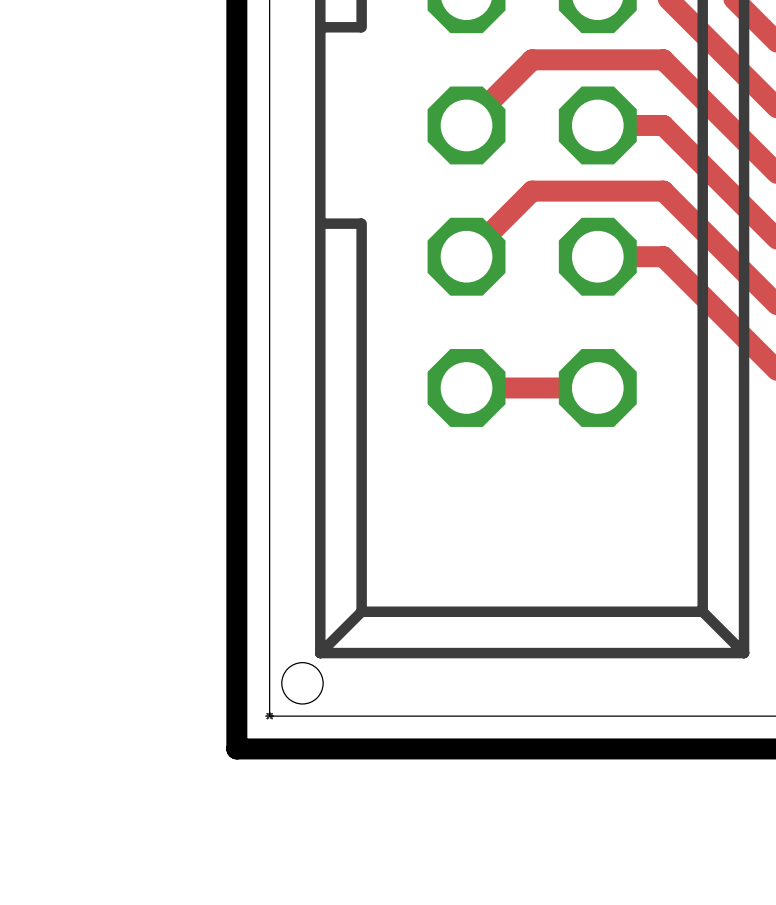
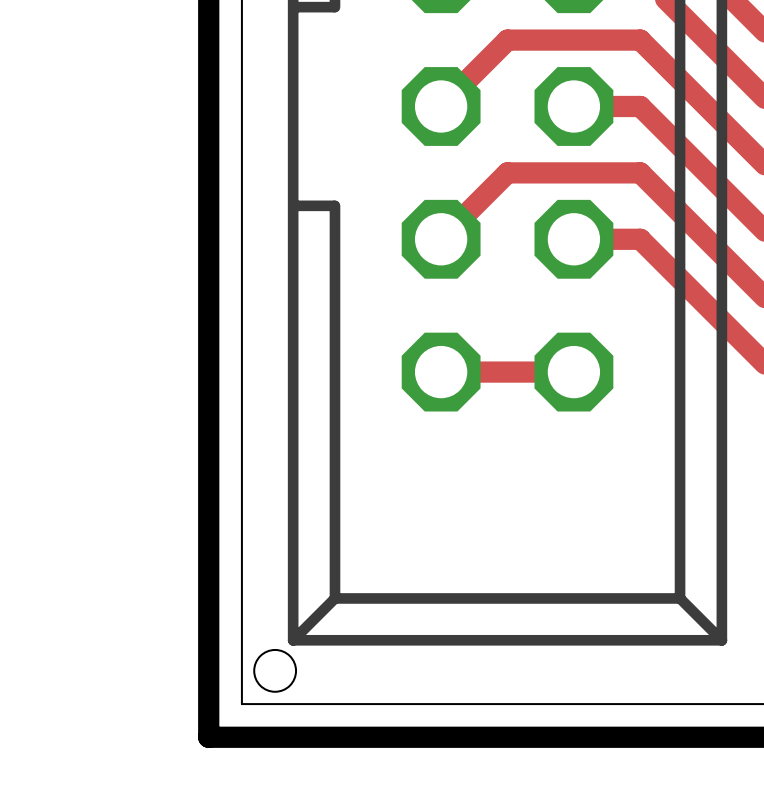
drawing: [265, 712, 274, 720] -> none

